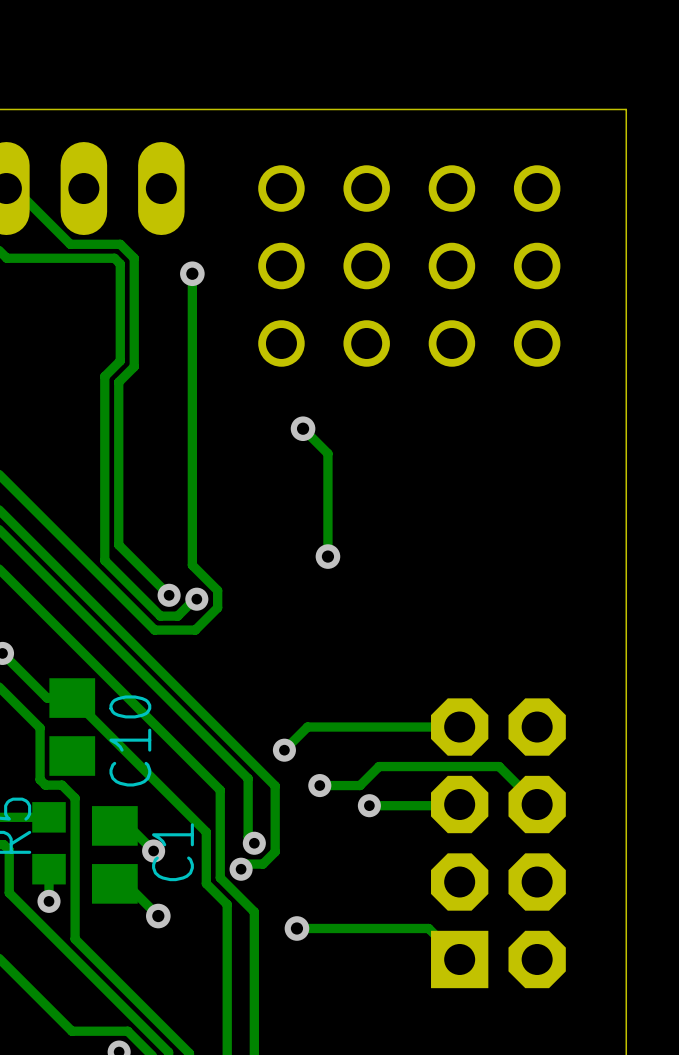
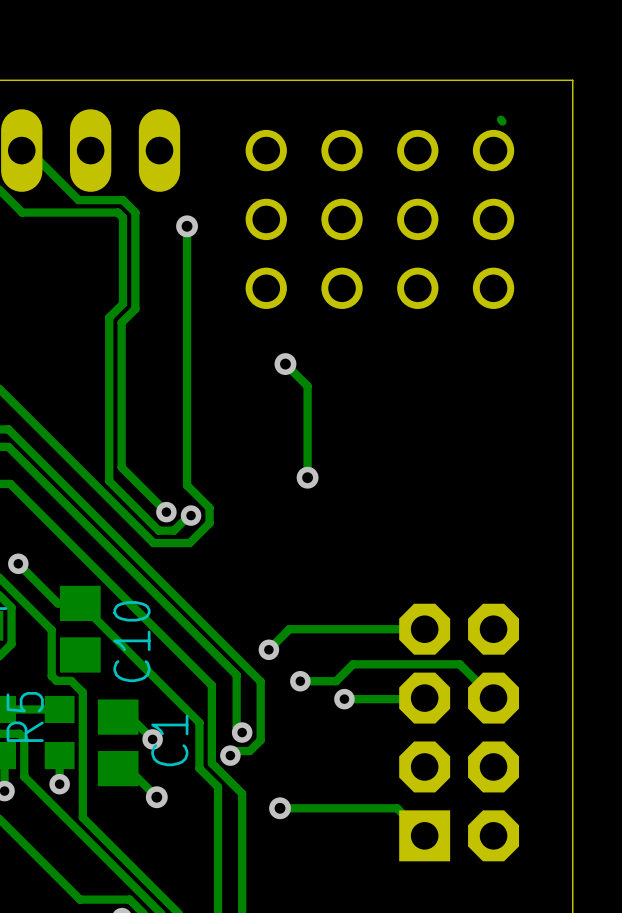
track: none -> (500, 119) (502, 121)

